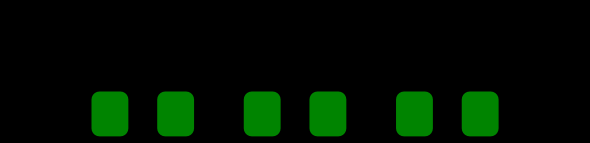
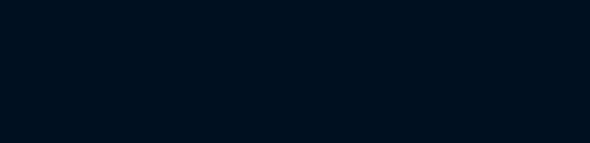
part: (142, 113) -> none
part: (295, 113) -> none
part: (447, 113) -> none

